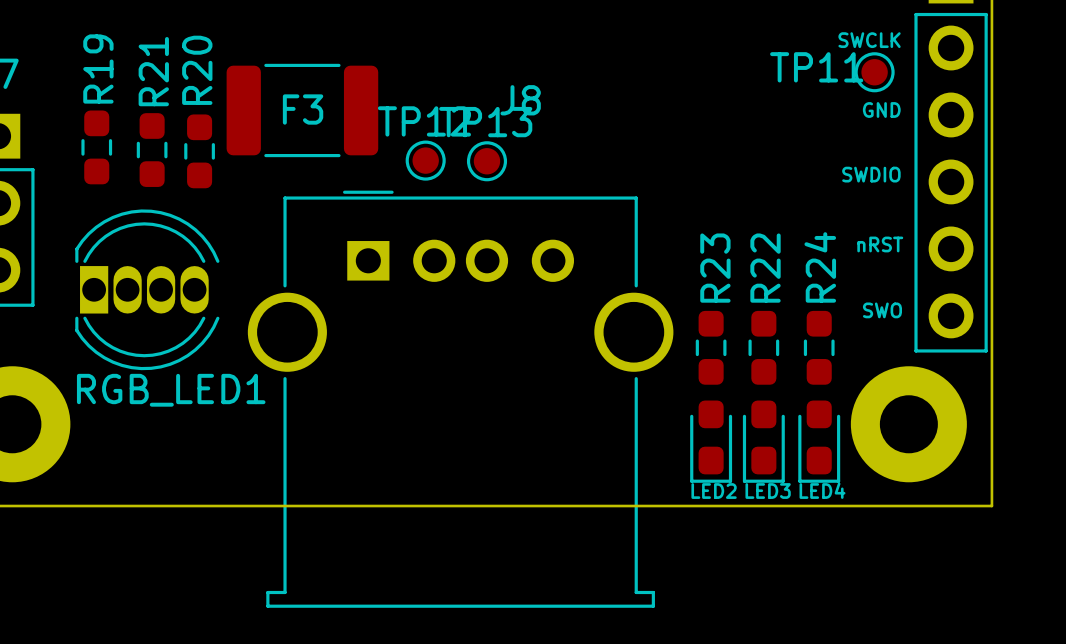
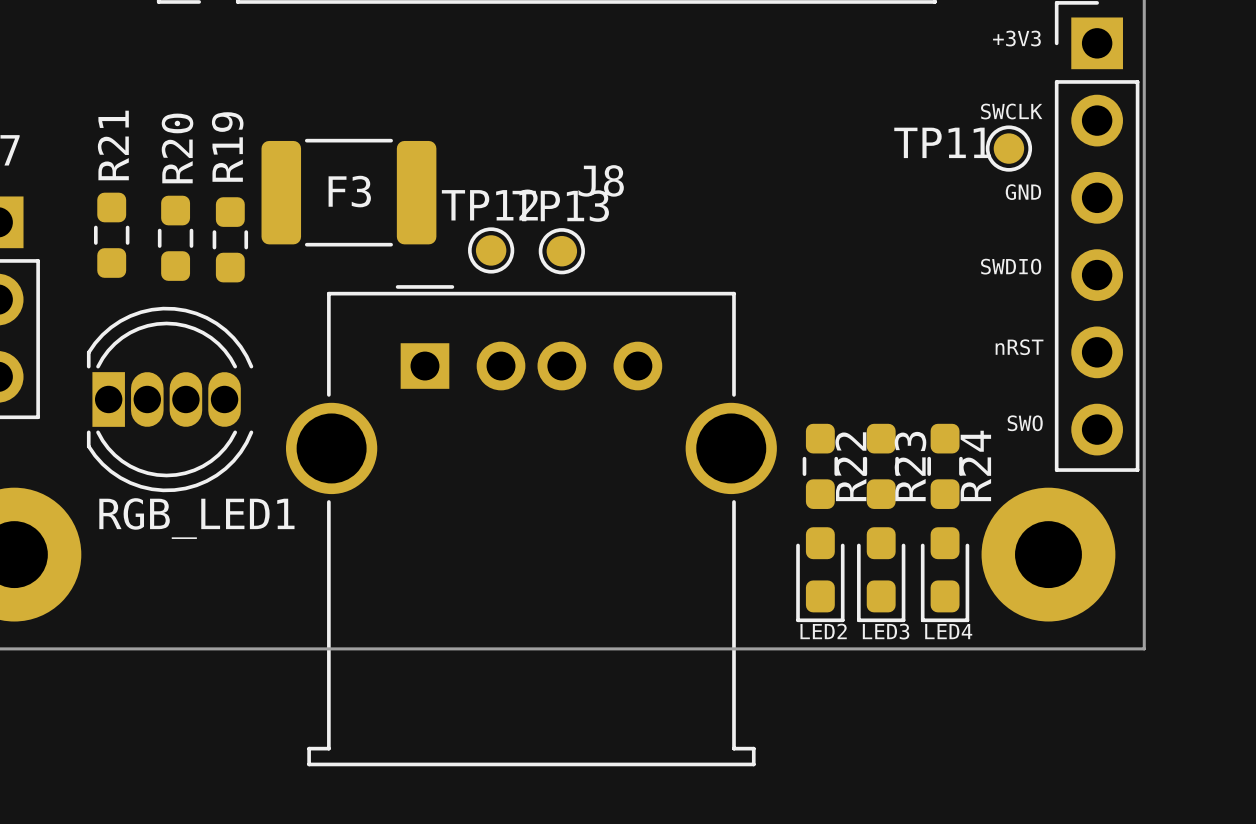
R19 name: R19 (98, 69) -> R21 (113, 145)
R20 name: R20 (197, 70) -> R19 (227, 147)
R21 name: R21 (153, 71) -> R20 (177, 148)
R24 name position: R24 (820, 267) -> R24 (975, 465)
R23 name: R23 (715, 268) -> R22 (850, 466)
R22 name: R22 (765, 268) -> R23 (910, 466)

